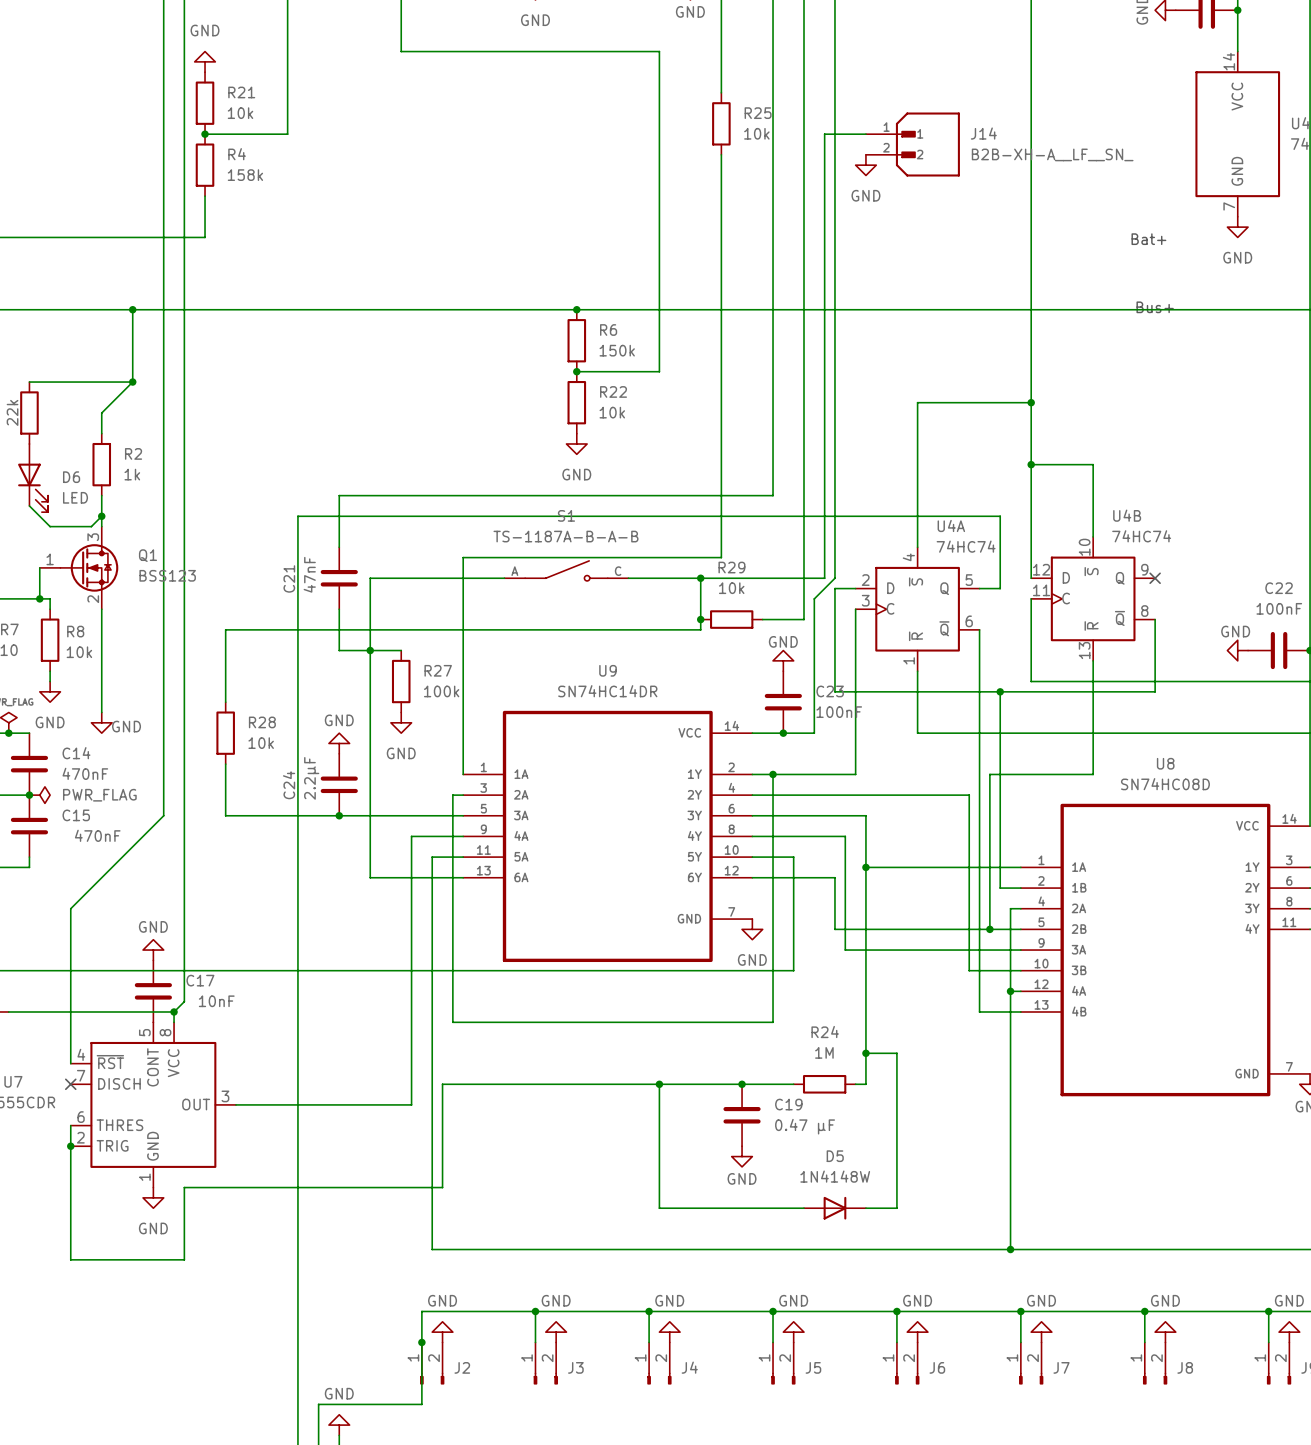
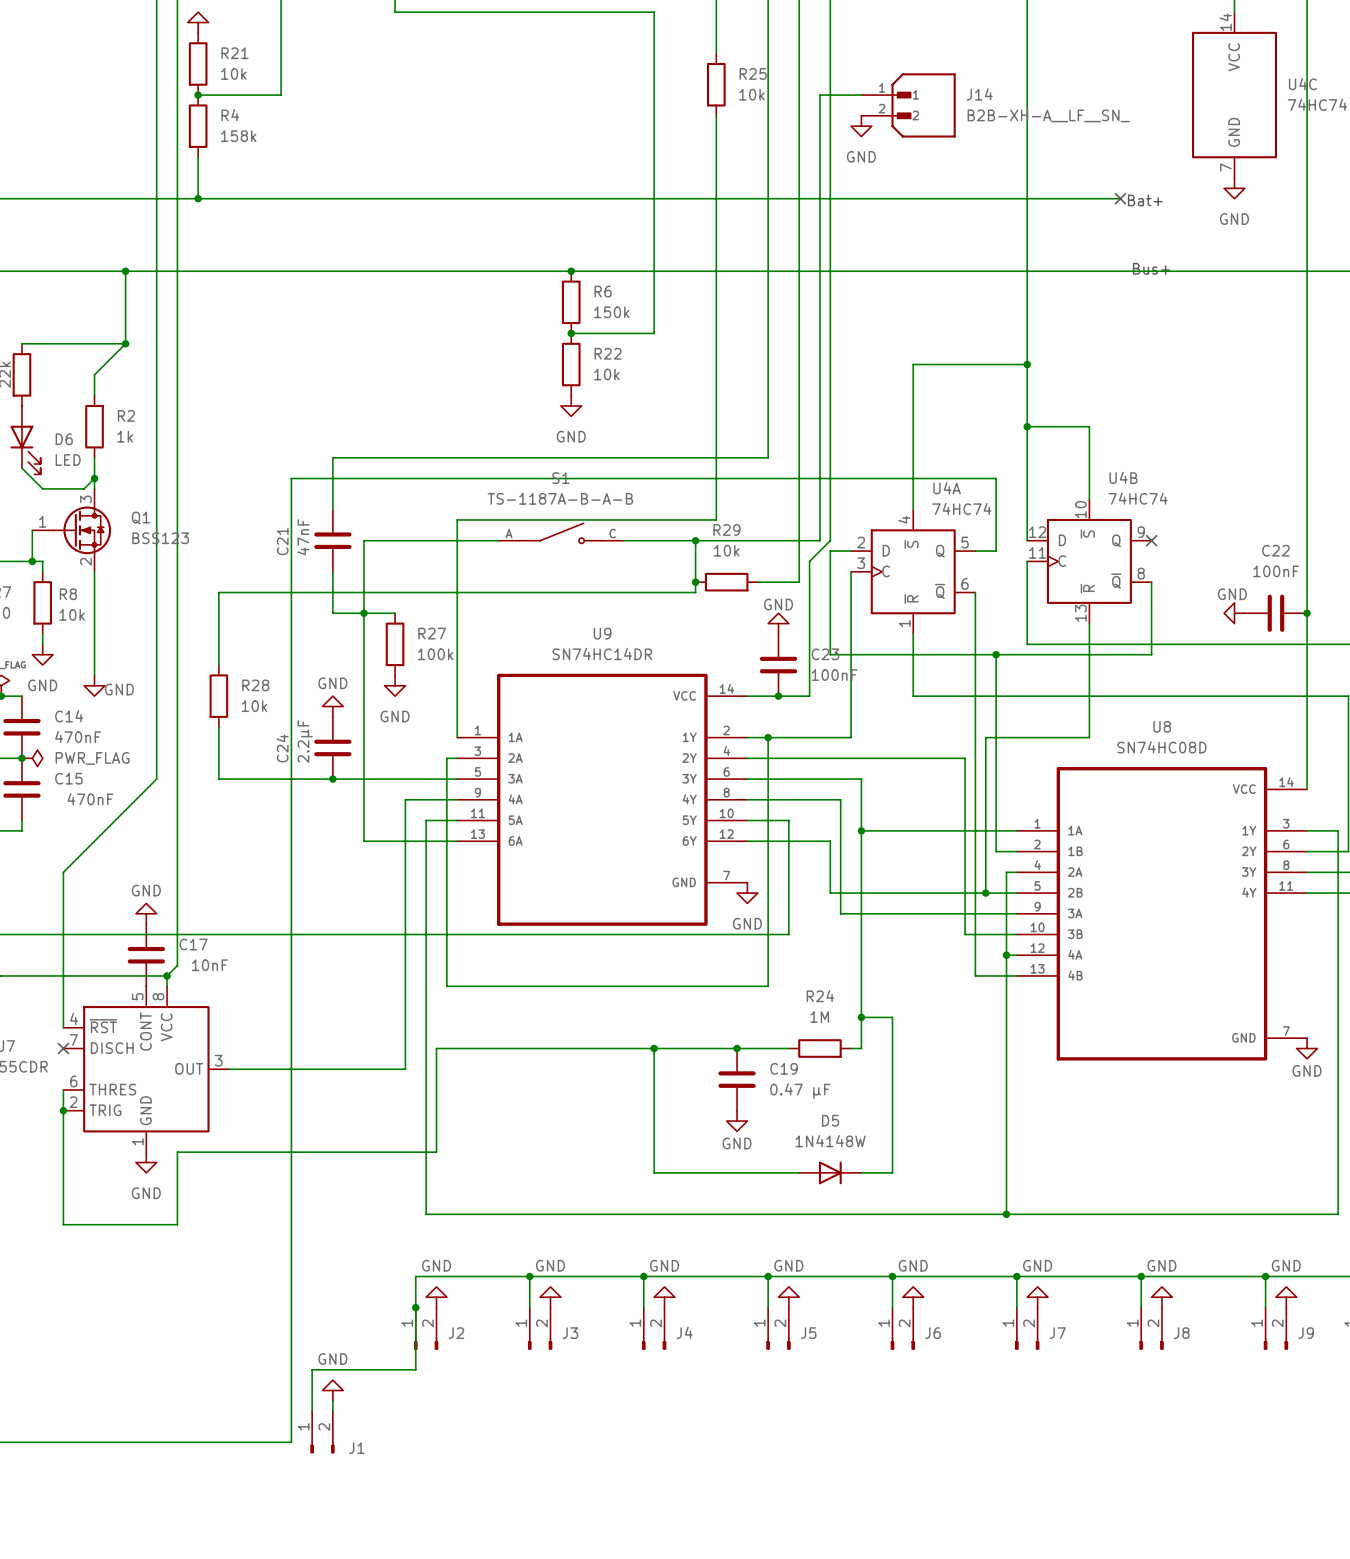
wire: none -> (198, 198) (1120, 198)
junction: none -> (198, 198)
no-connect mark: none -> (1120, 198)

